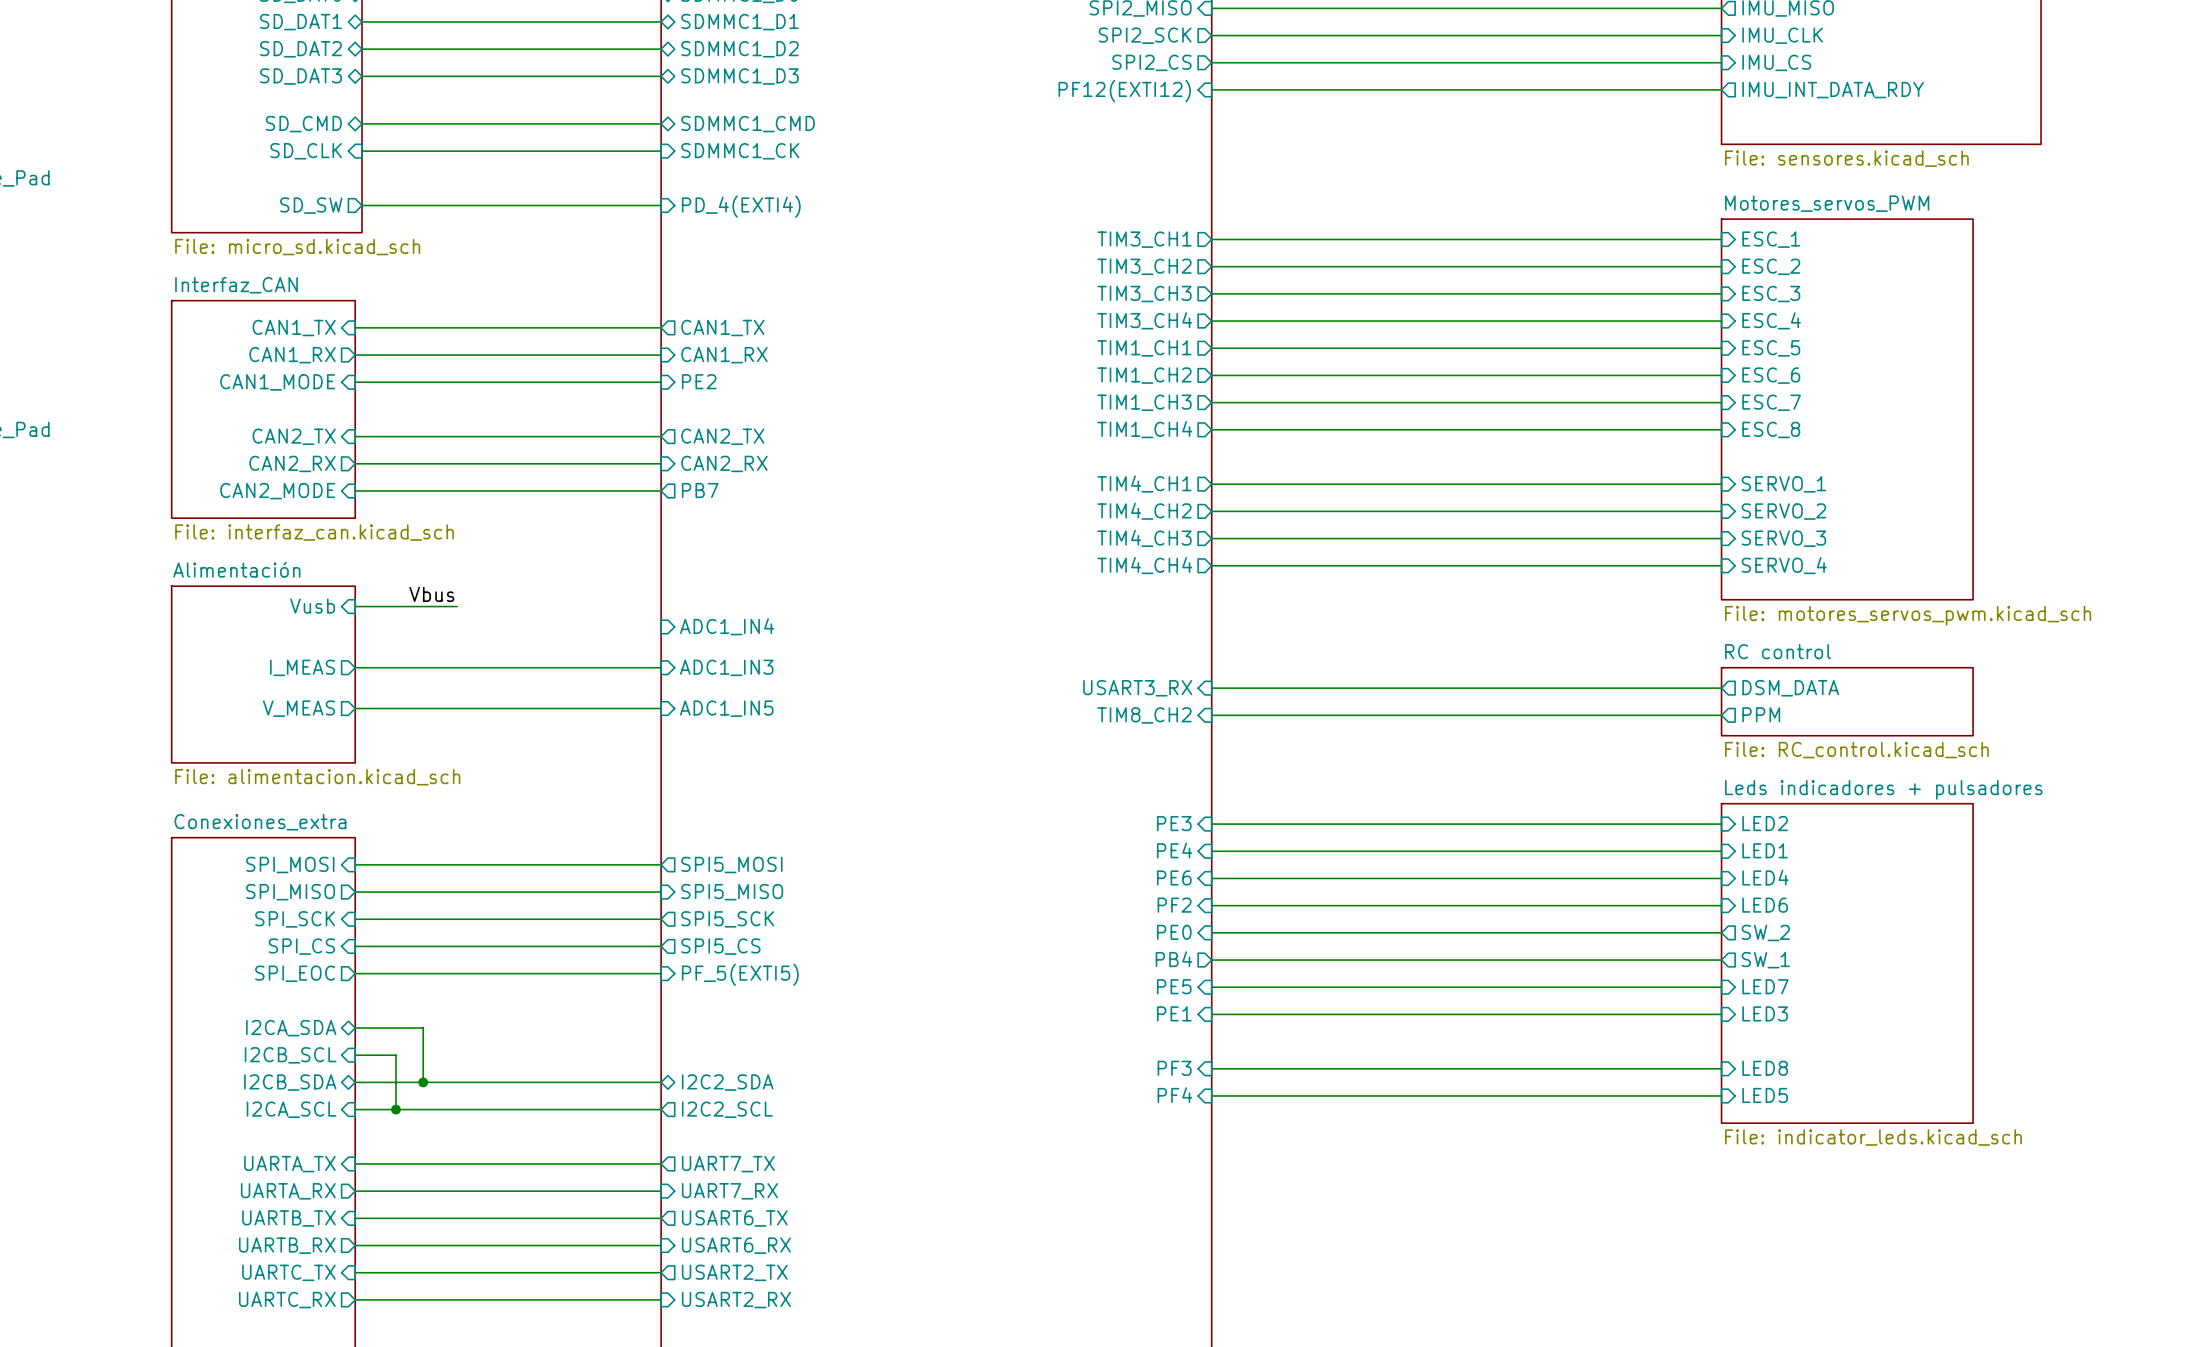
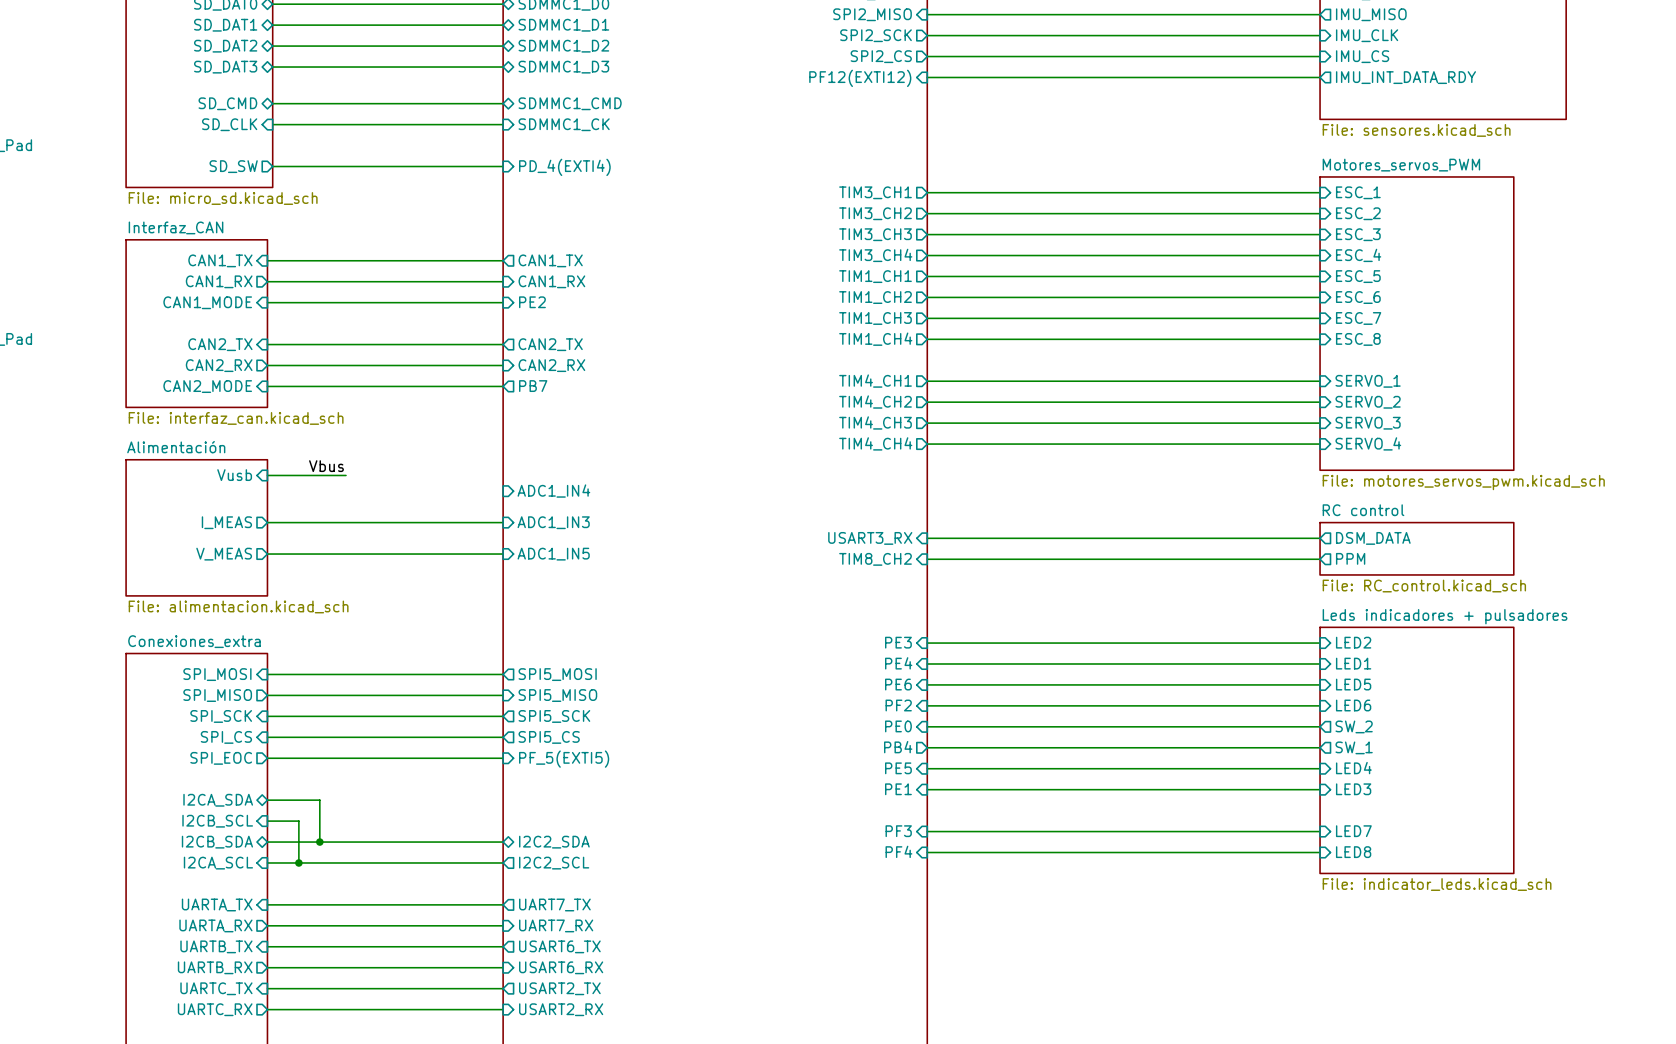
sheet pin: LED4 (1765, 877) -> LED5 (1353, 684)
sheet pin: LED7 (1765, 986) -> LED4 (1353, 768)
sheet pin: LED8 (1765, 1068) -> LED7 (1353, 831)
sheet pin: LED5 (1765, 1095) -> LED8 (1353, 852)

